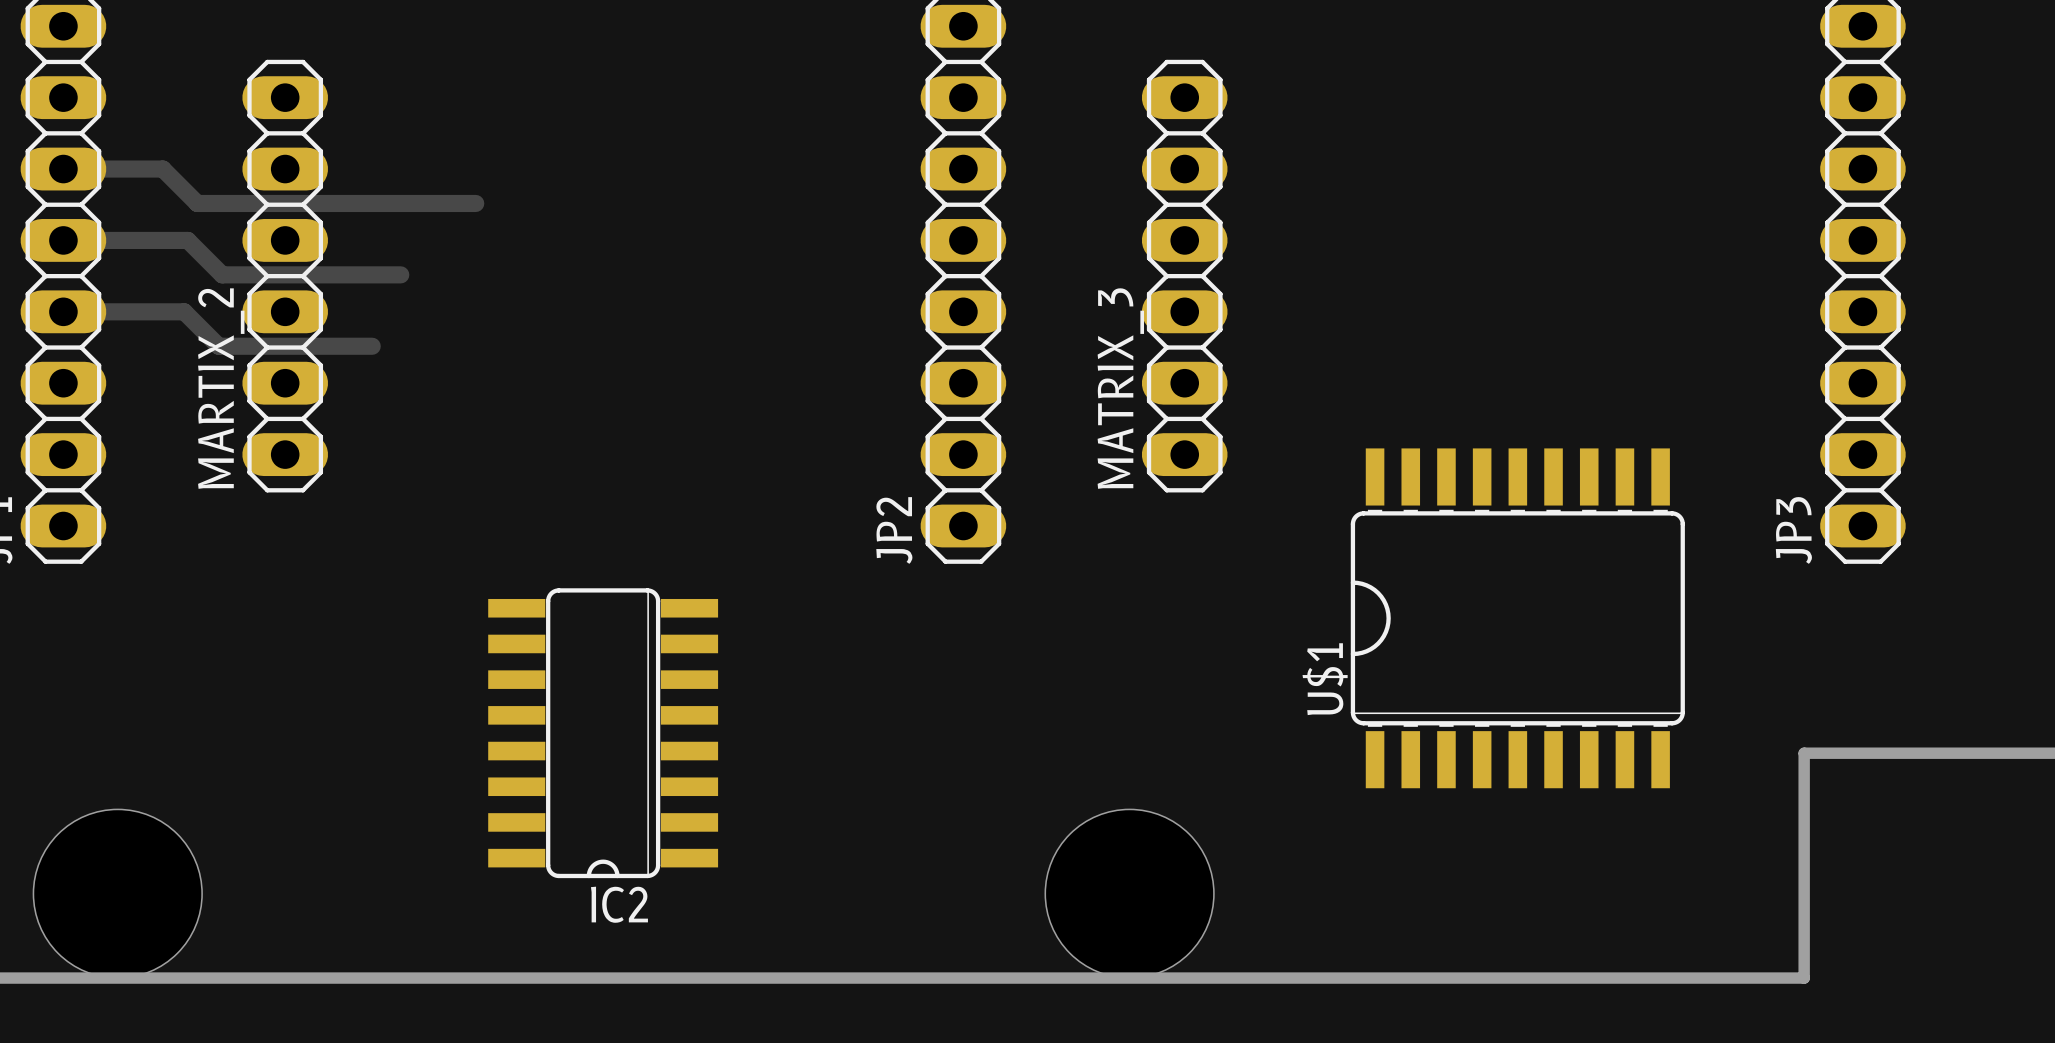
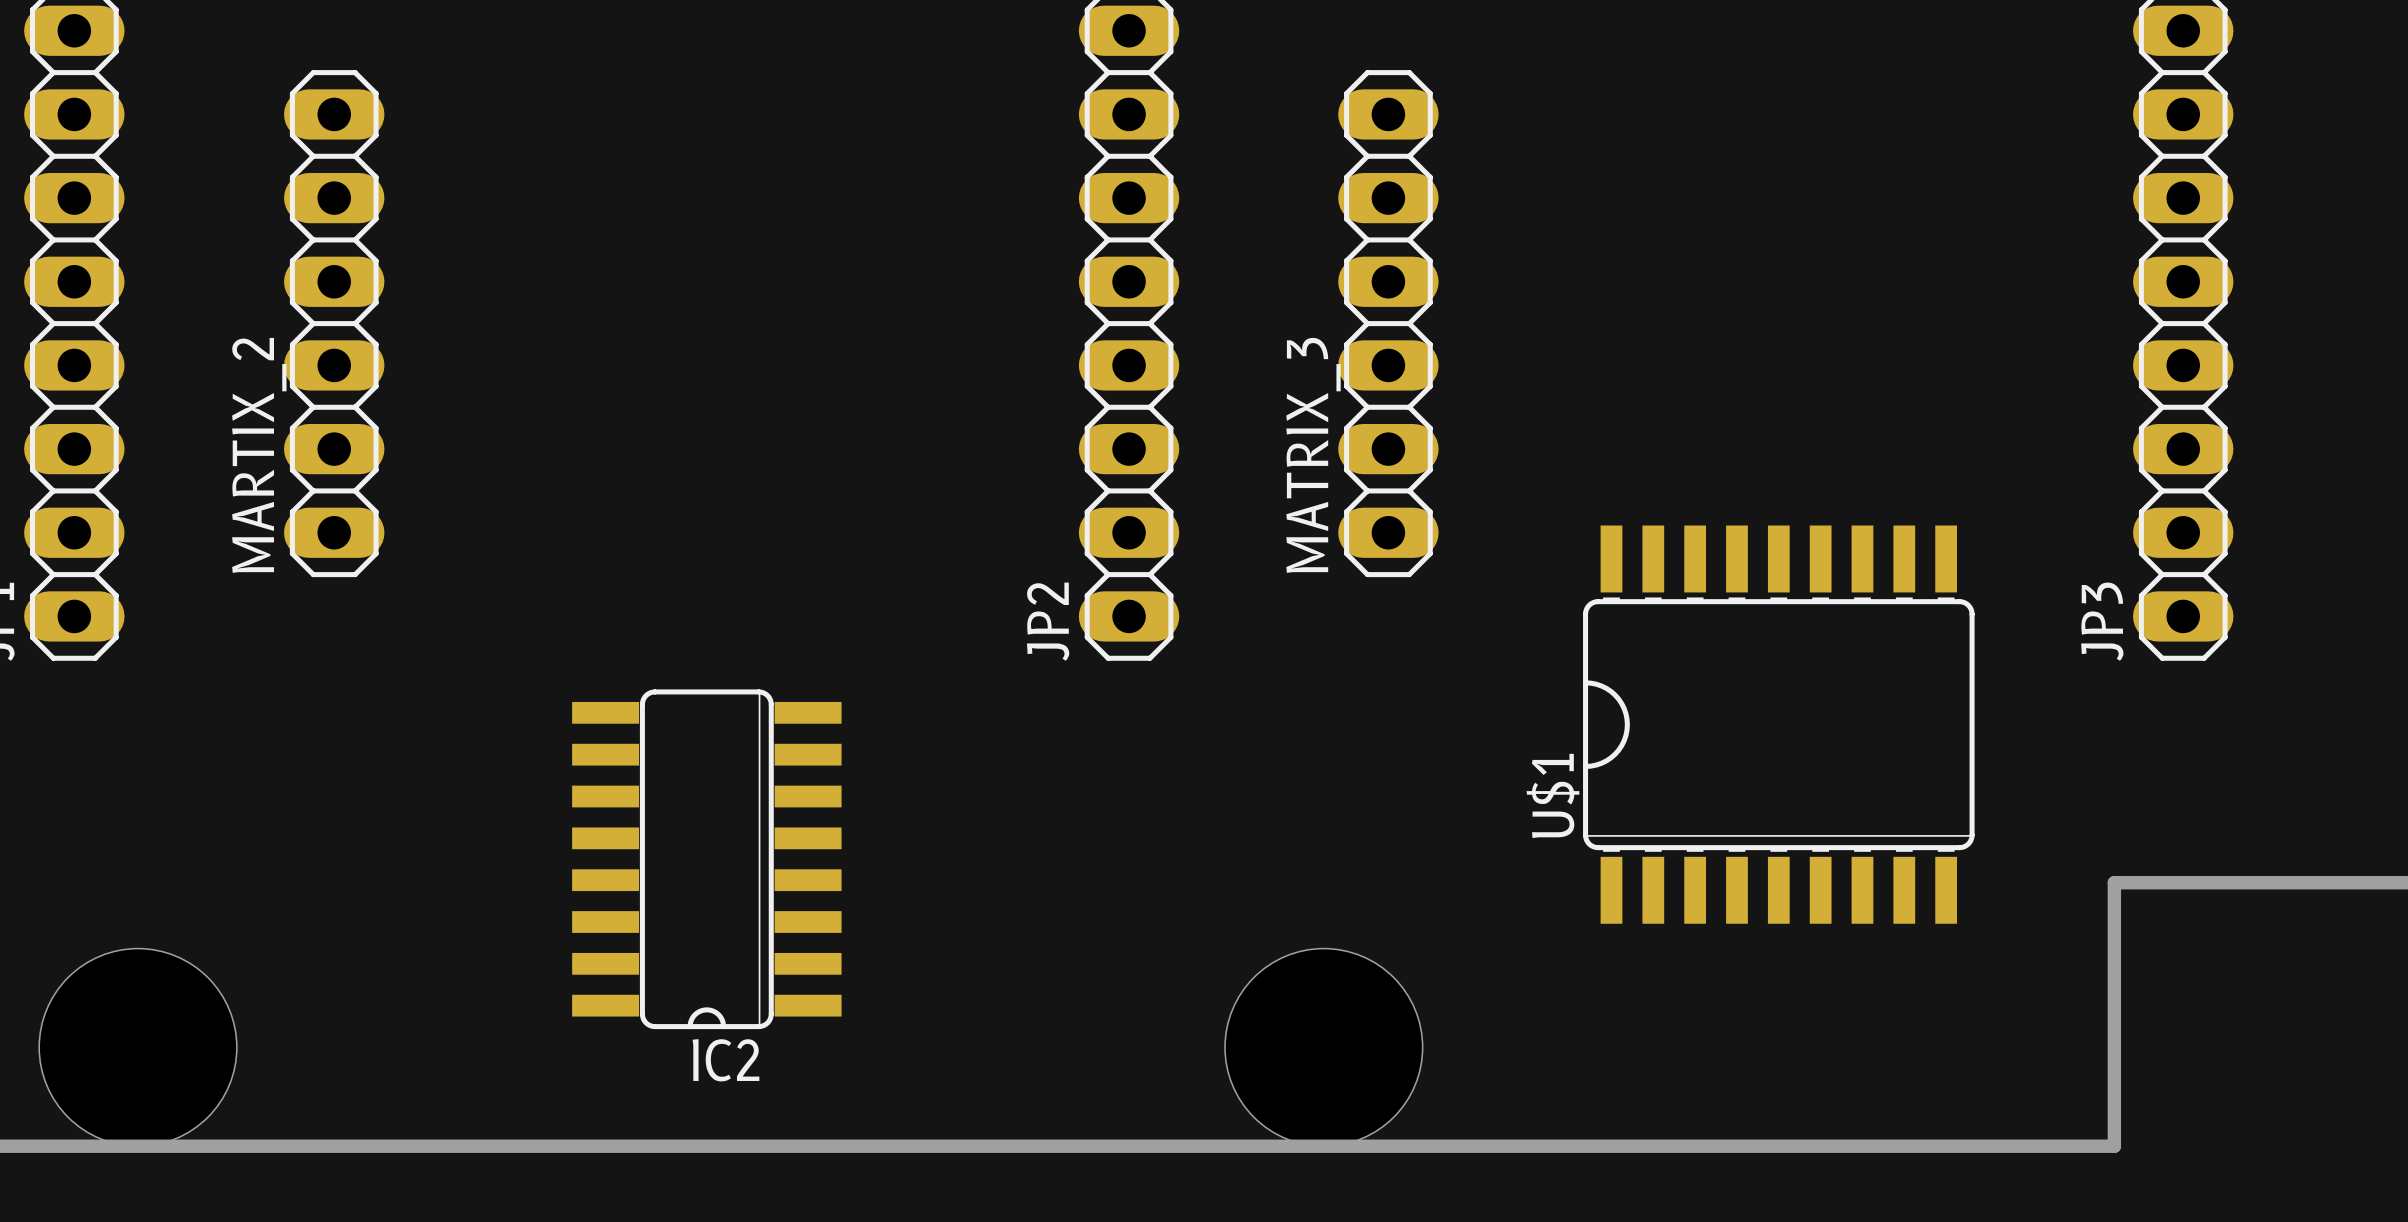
track: (63, 169) (162, 169) (197, 203) (475, 203) -> none
track: (63, 240) (187, 240) (222, 274) (400, 274) -> none
track: (63, 311) (184, 311) (218, 346) (372, 346) -> none

